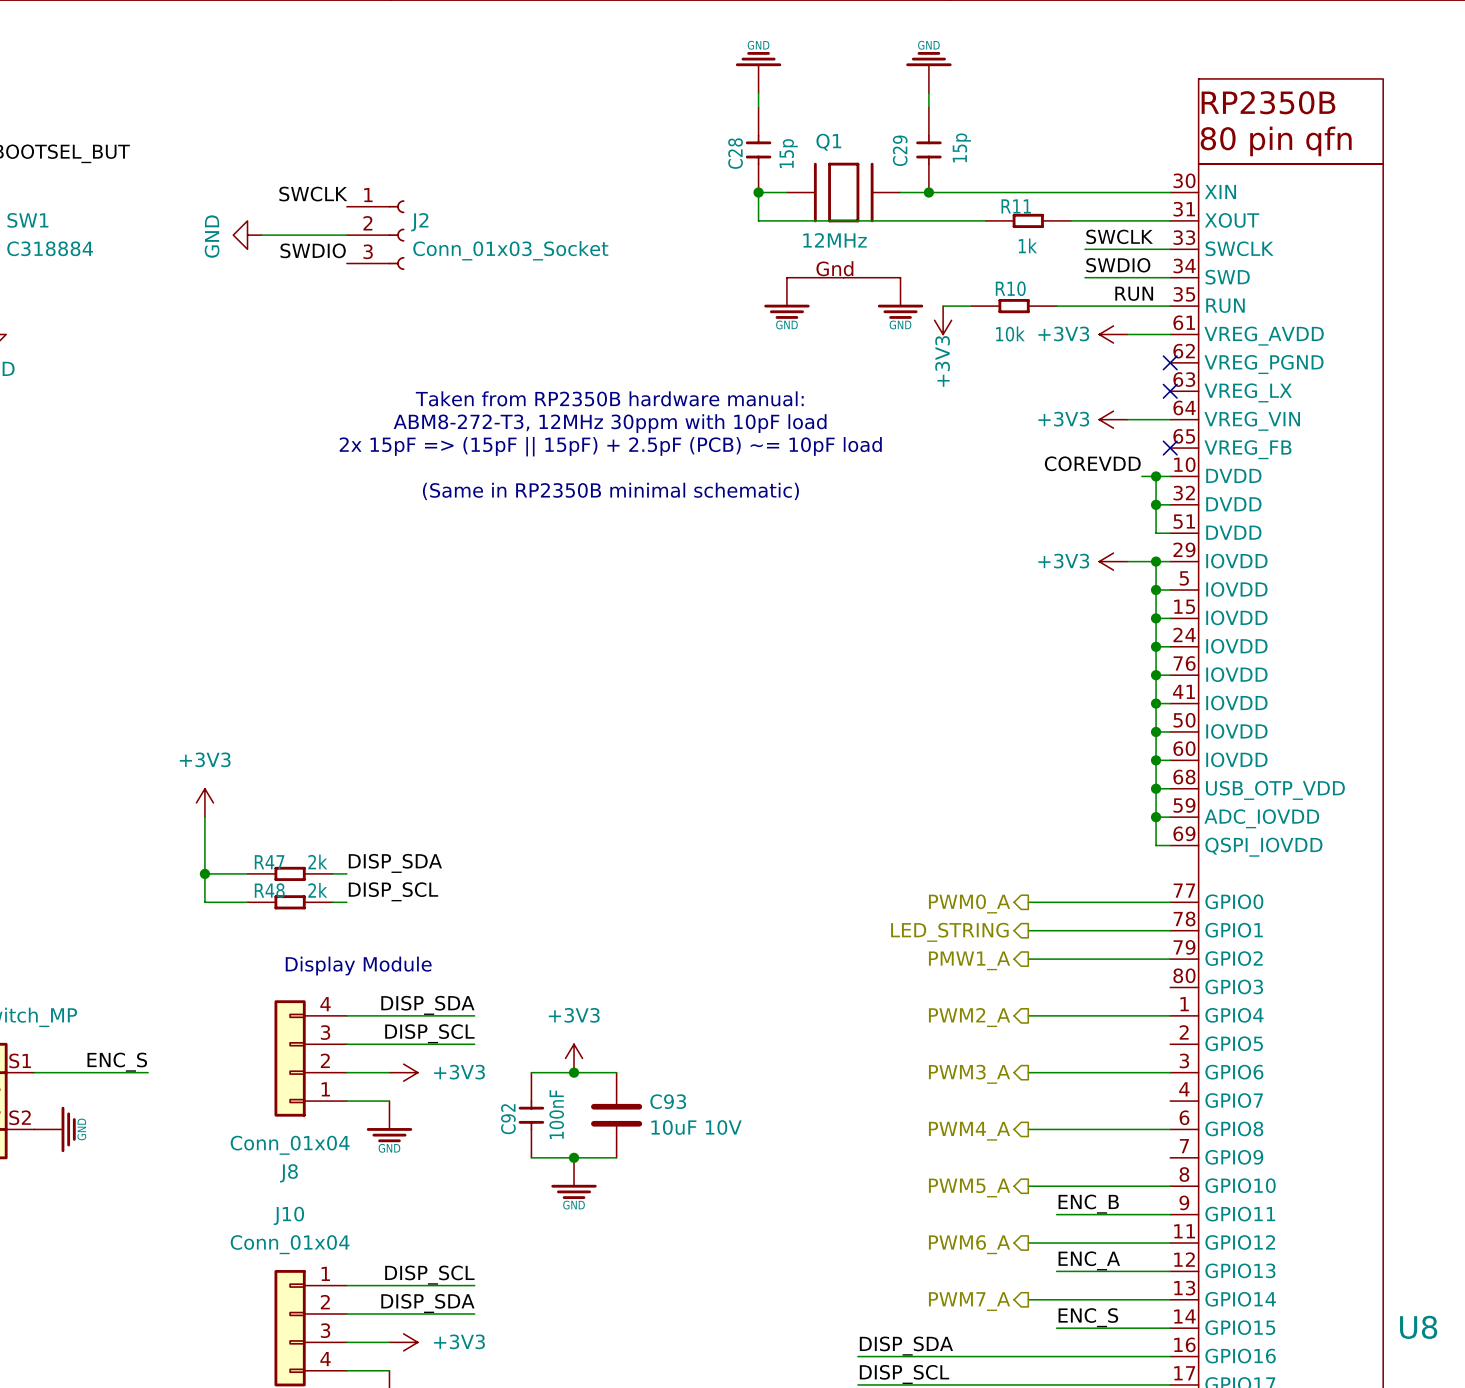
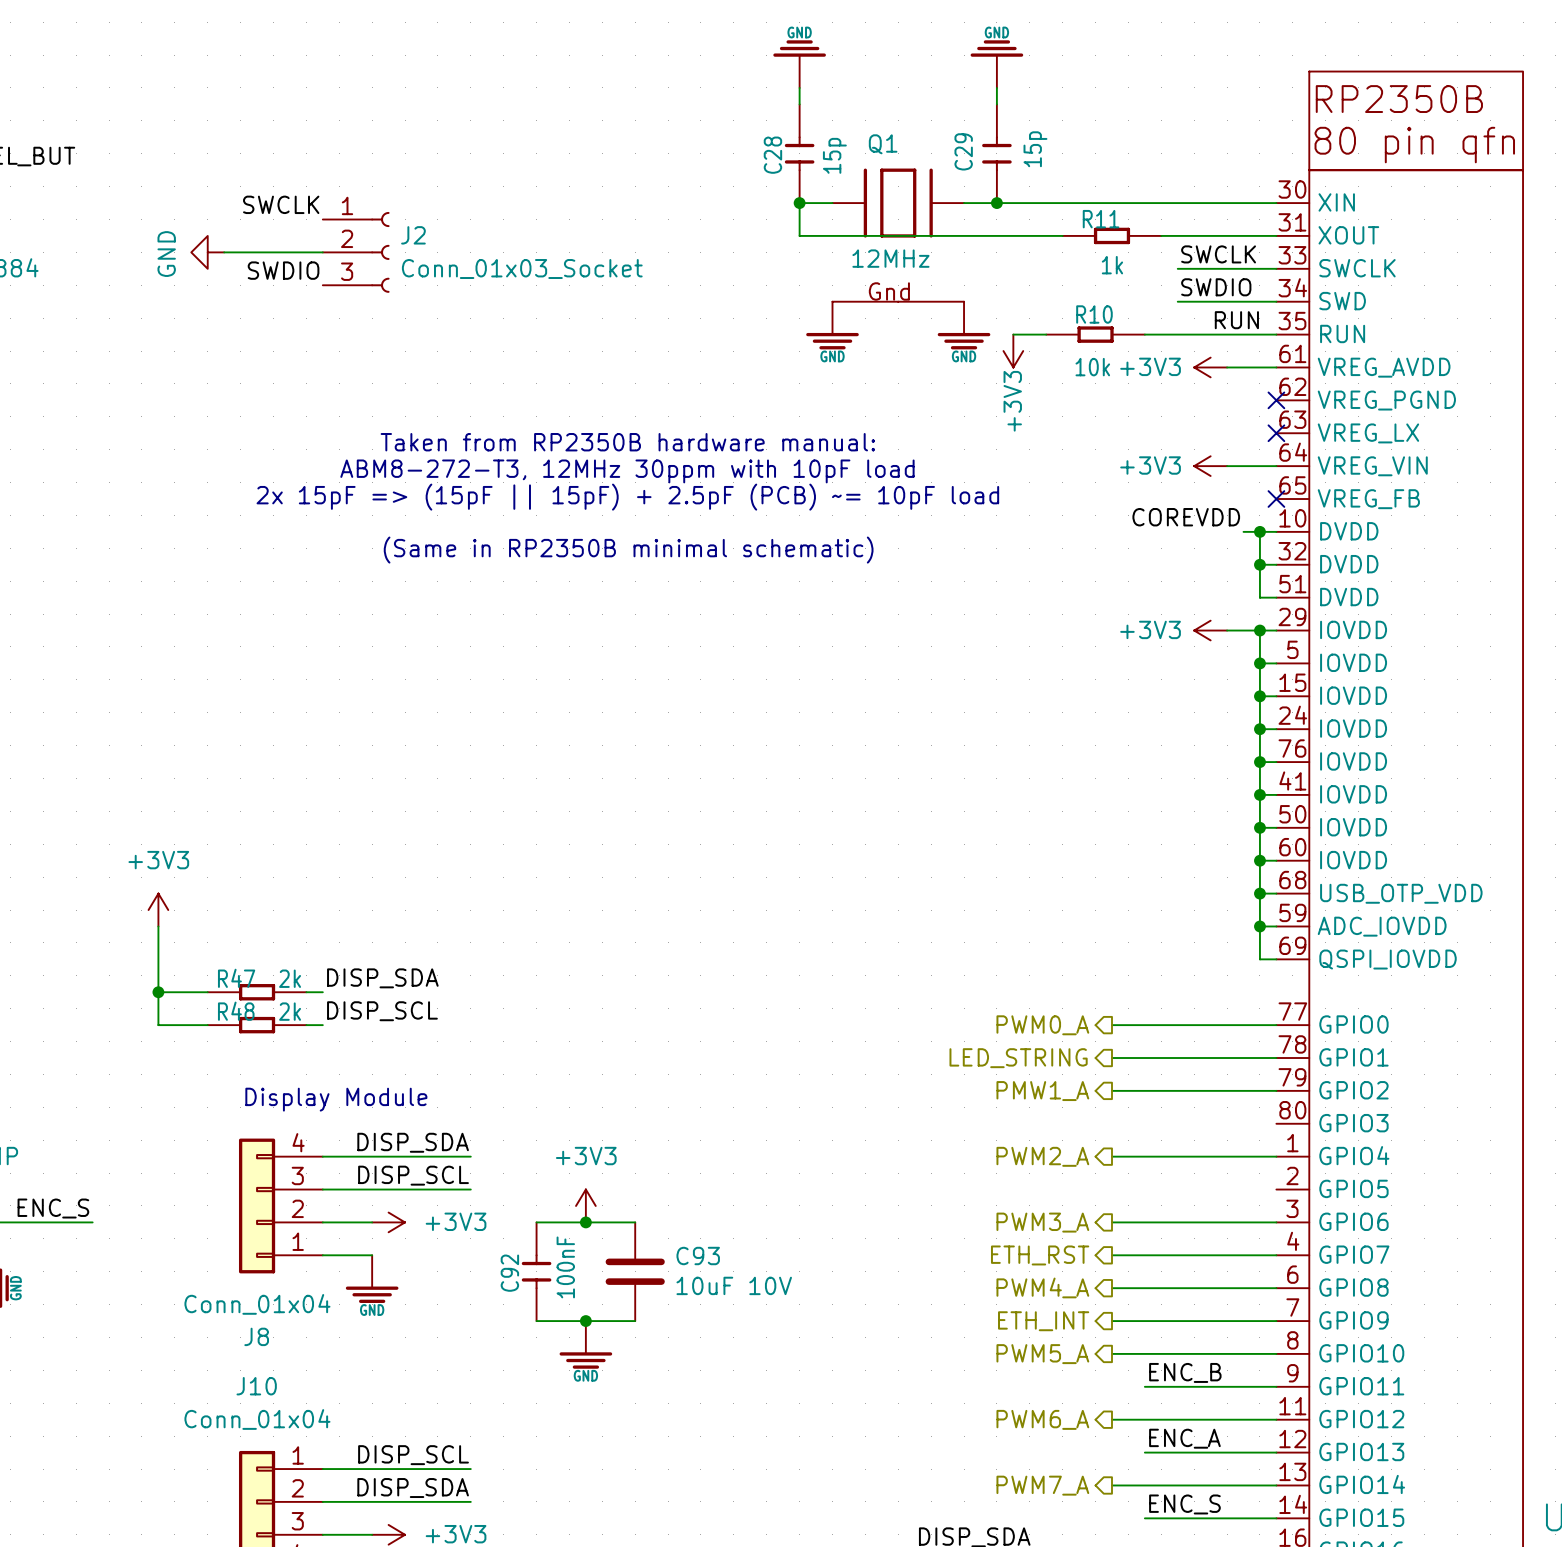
wire: none -> (1112, 1255) (1276, 1255)
hierarchical label: none -> ETH_RST (1040, 1255)
wire: none -> (1112, 1321) (1276, 1321)
hierarchical label: none -> ETH_INT (1043, 1321)

